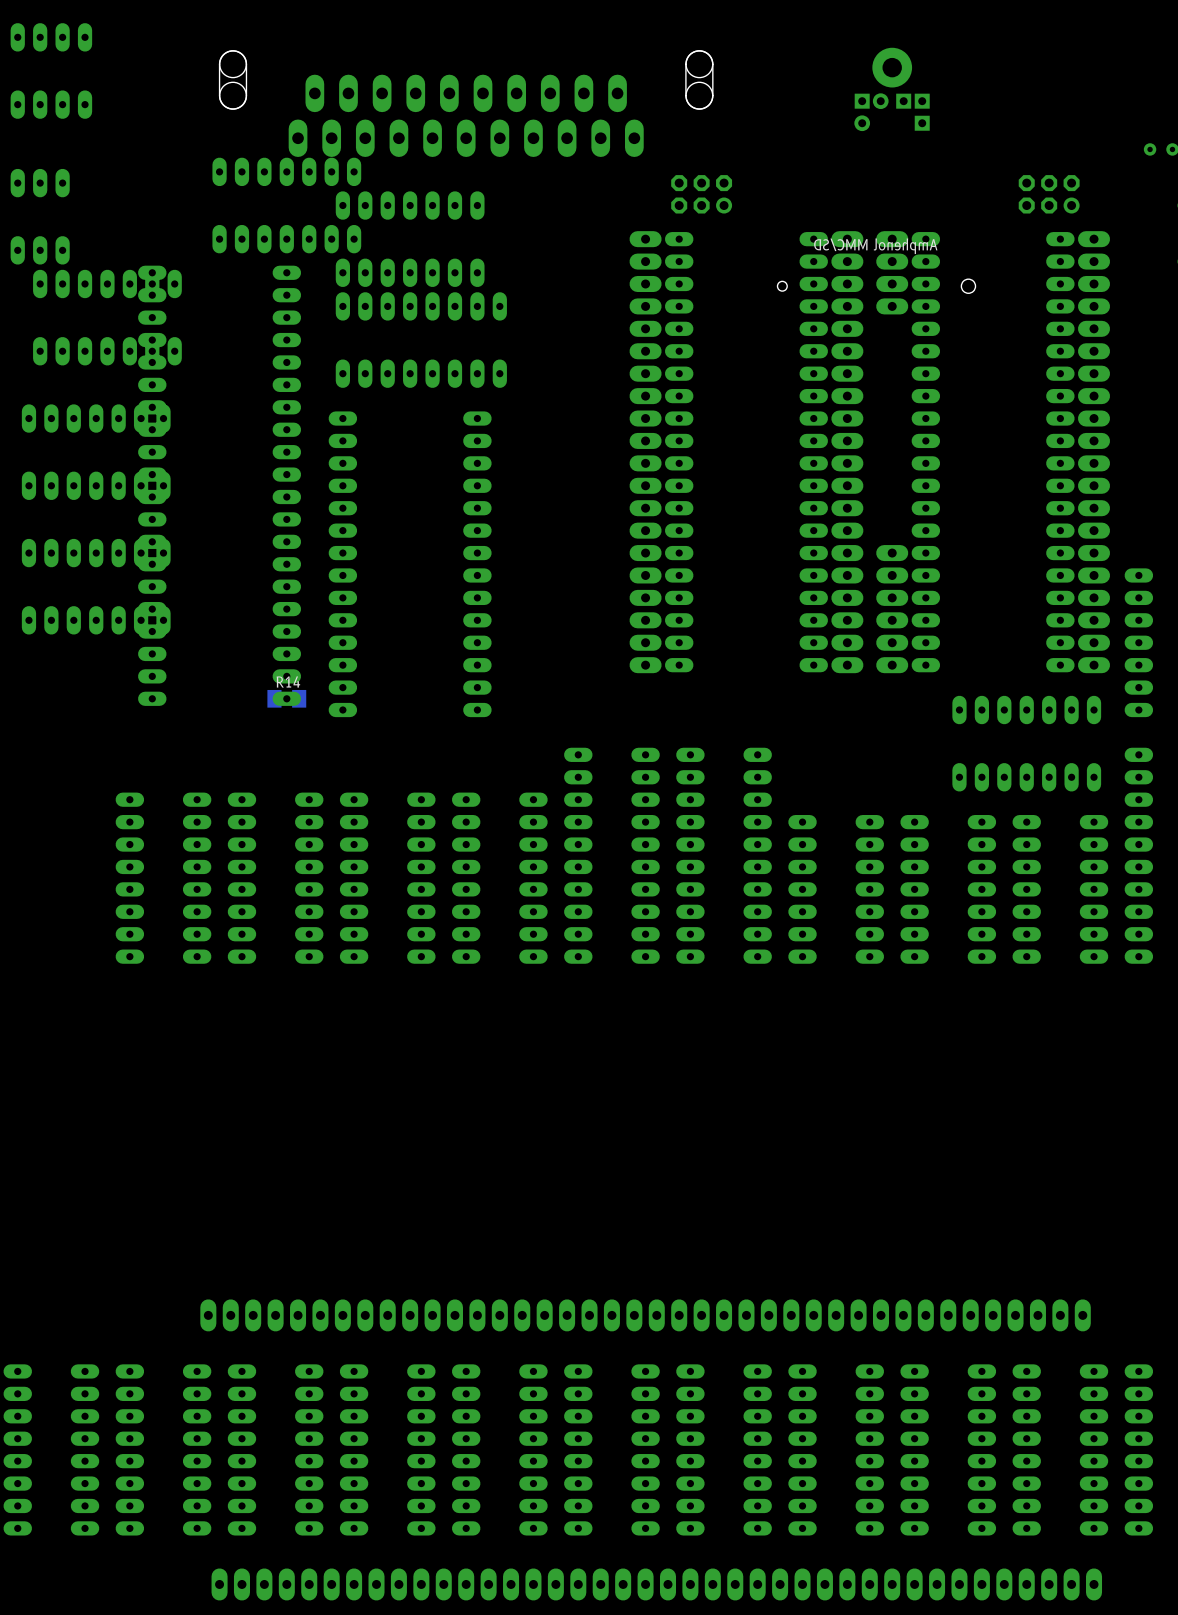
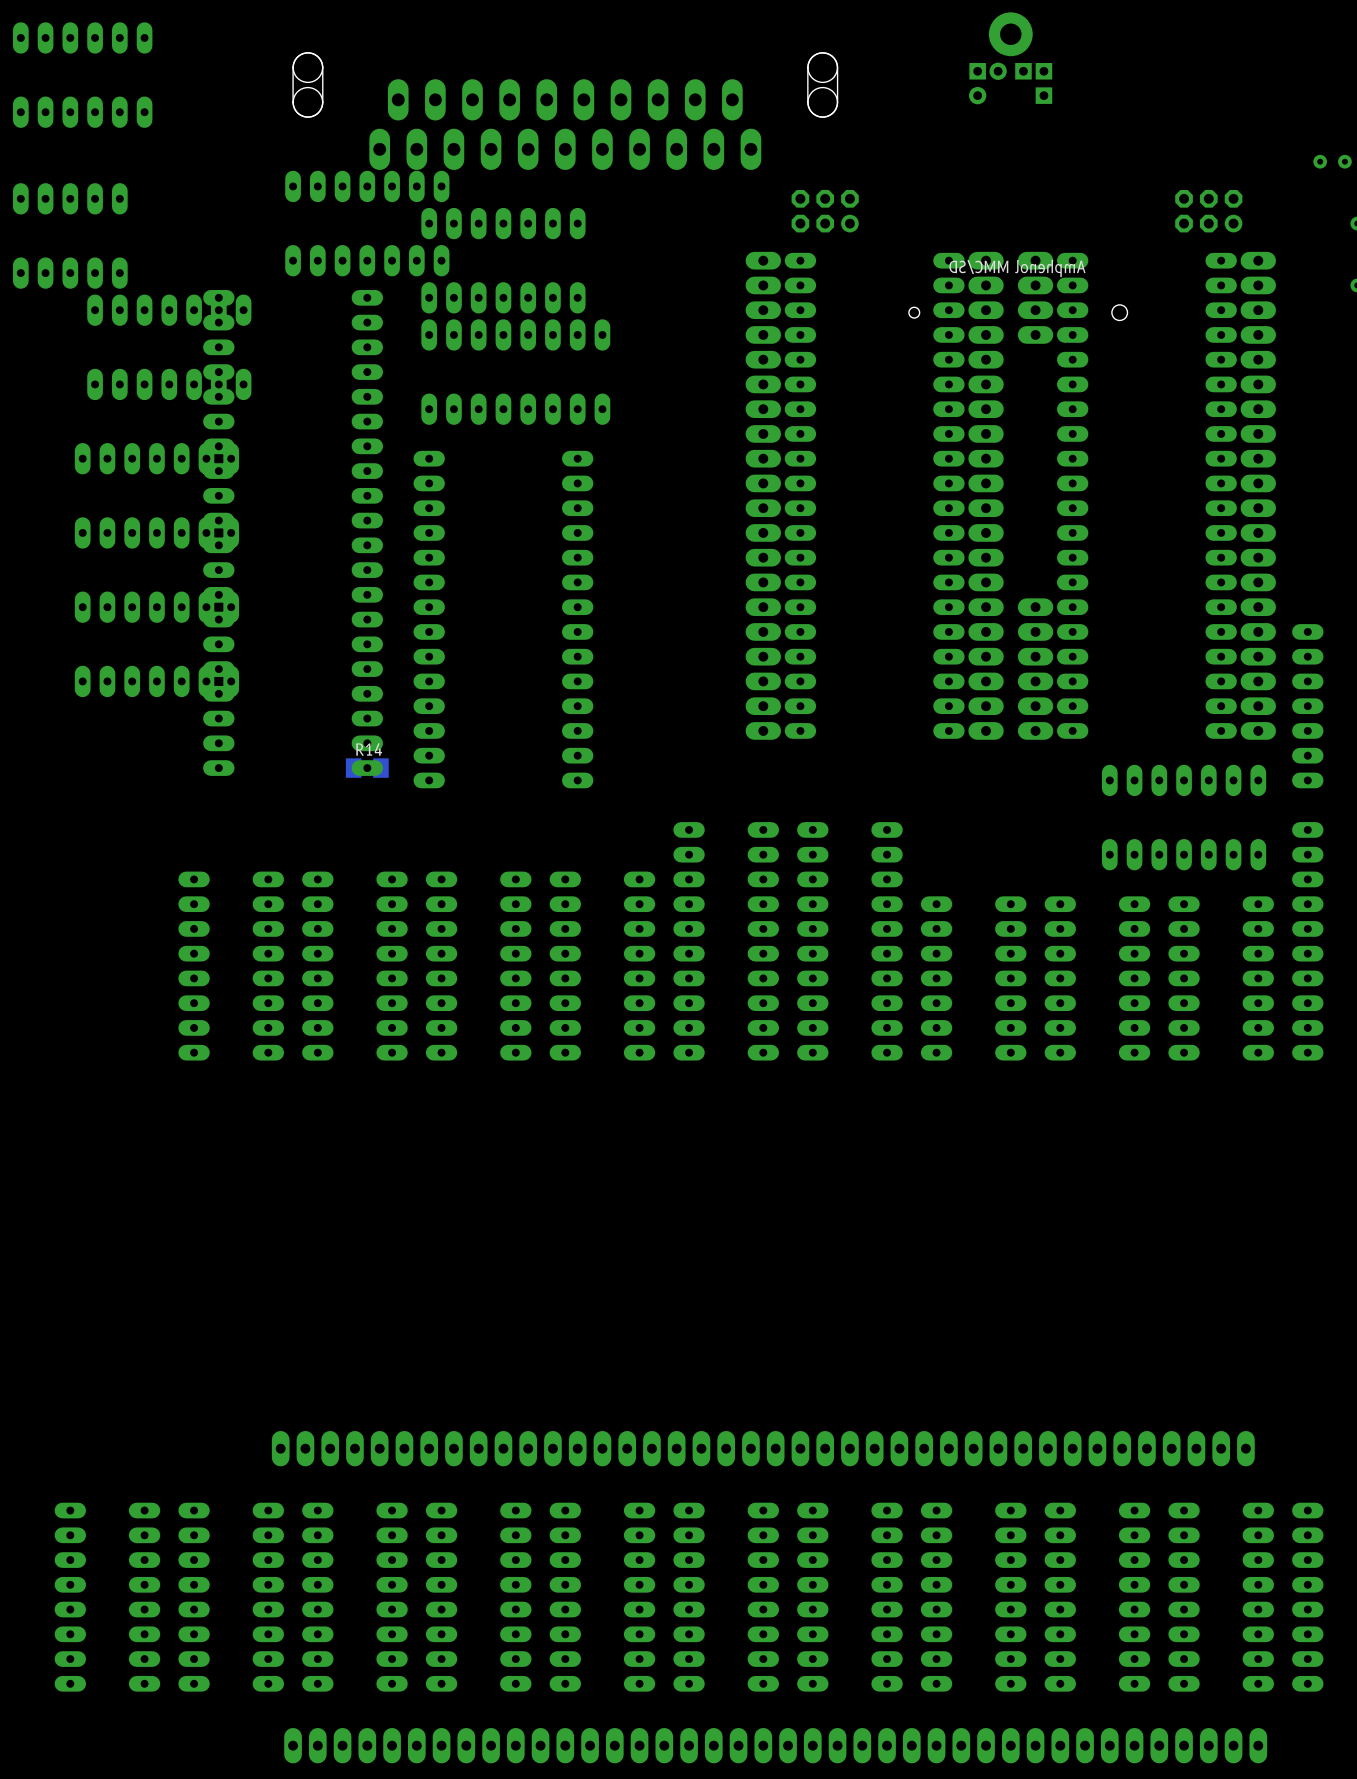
part position: (892, 89) -> (1010, 58)

